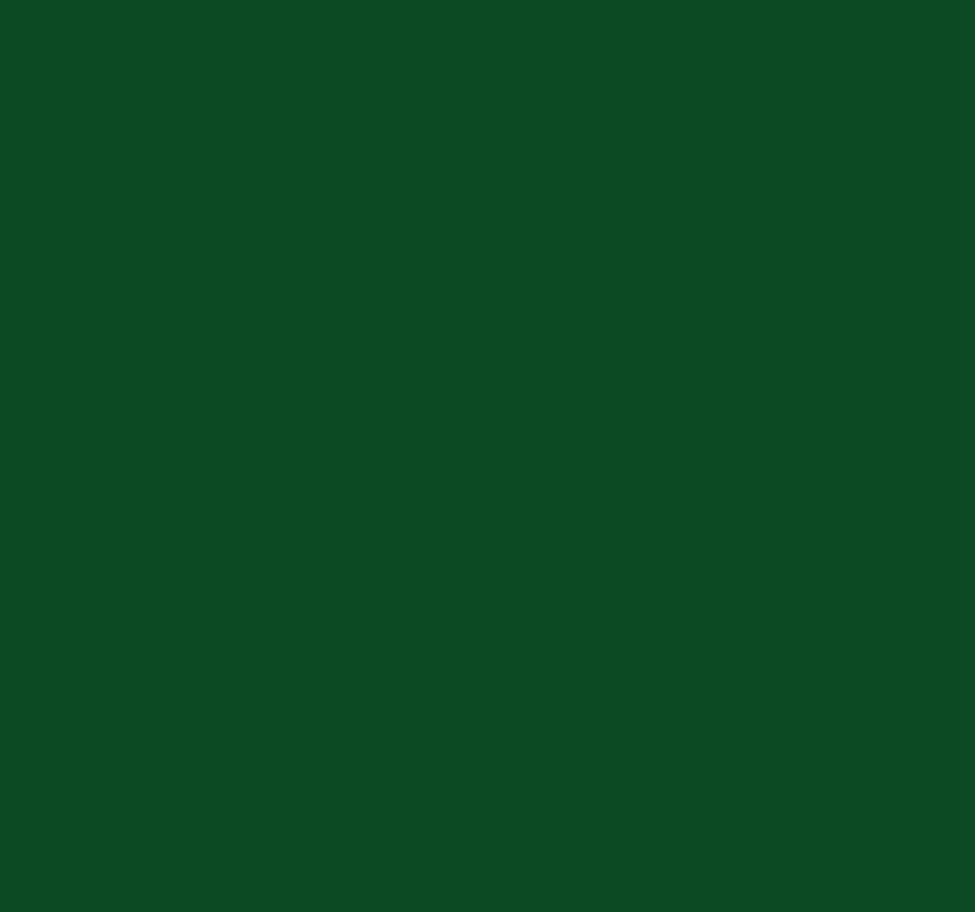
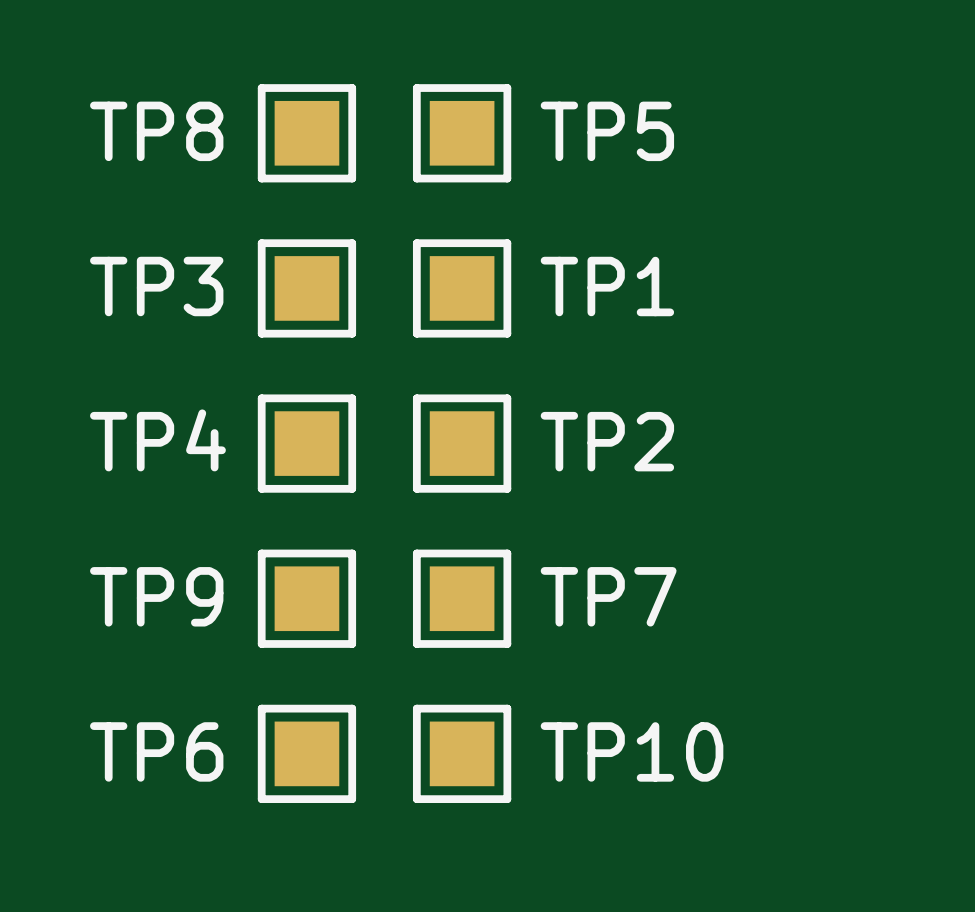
TP8: none -> (306, 133)
TP5: none -> (462, 133)
TP3: none -> (306, 288)
TP1: none -> (462, 288)
TP4: none -> (306, 443)
TP2: none -> (462, 443)
TP9: none -> (306, 598)
TP7: none -> (462, 598)
TP6: none -> (306, 753)
TP10: none -> (462, 753)

